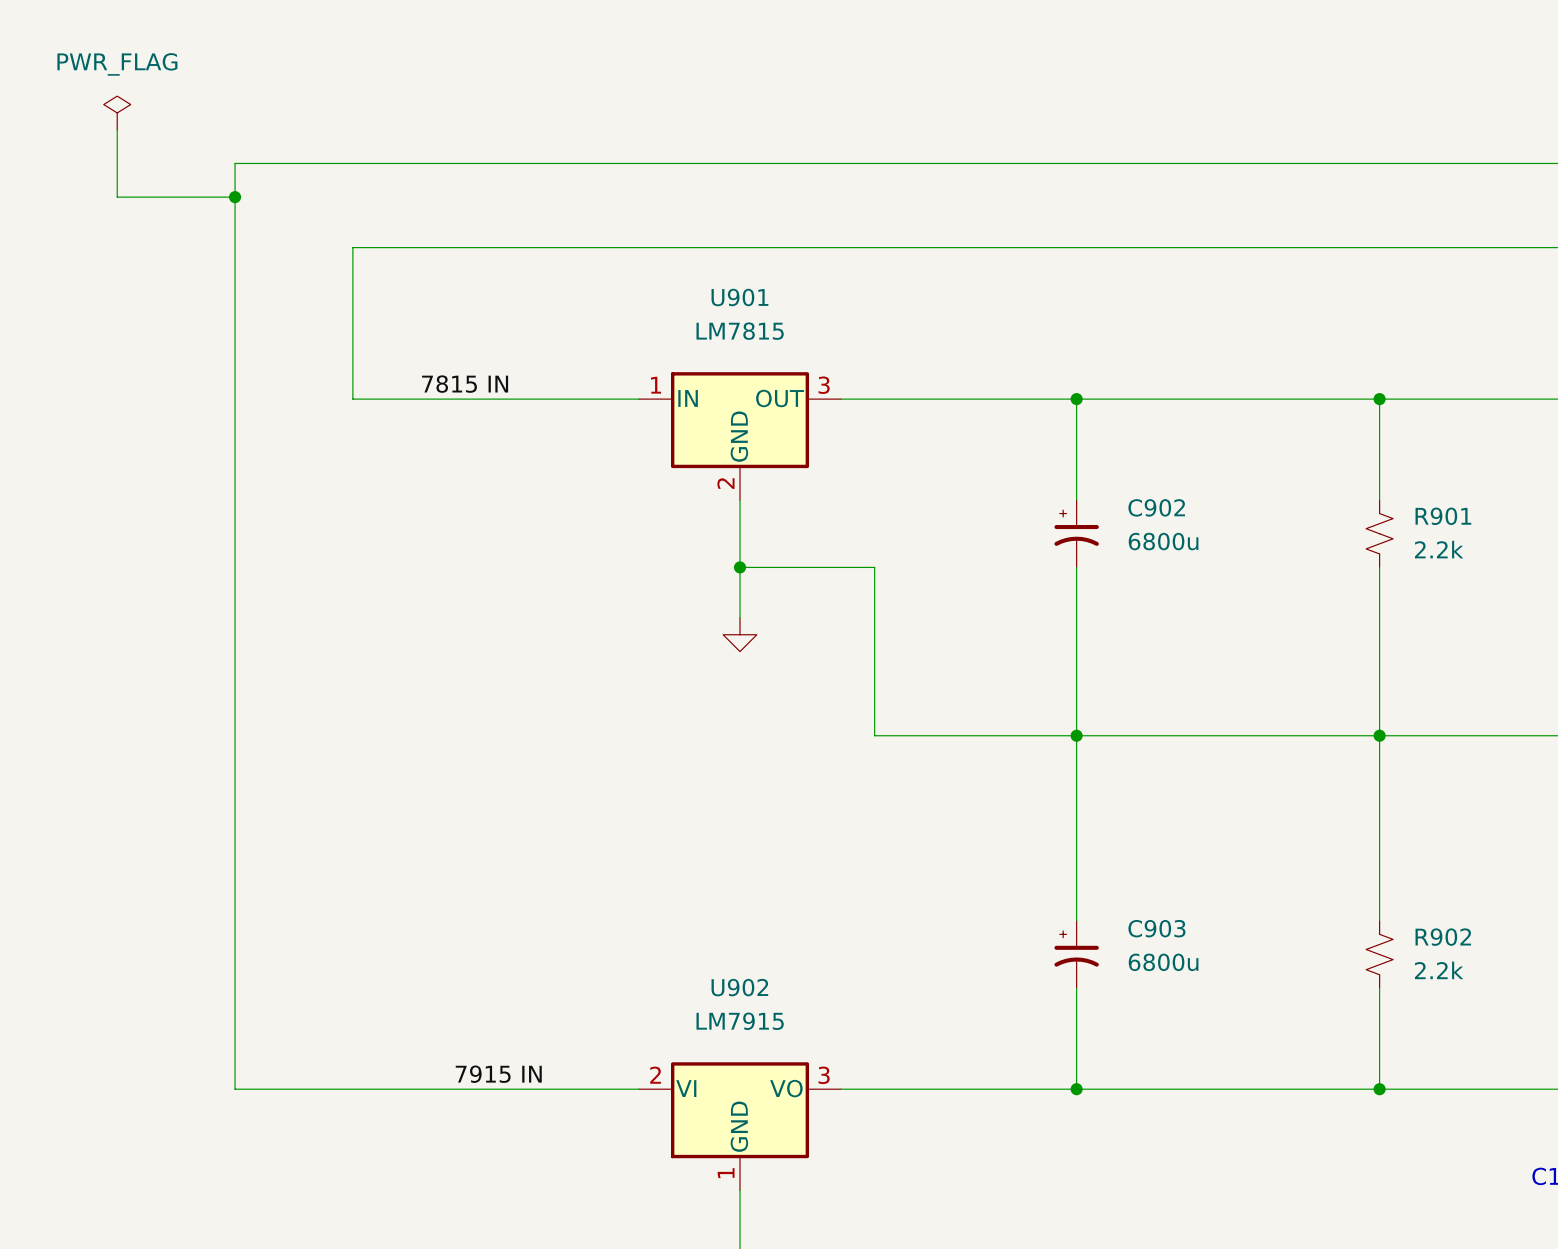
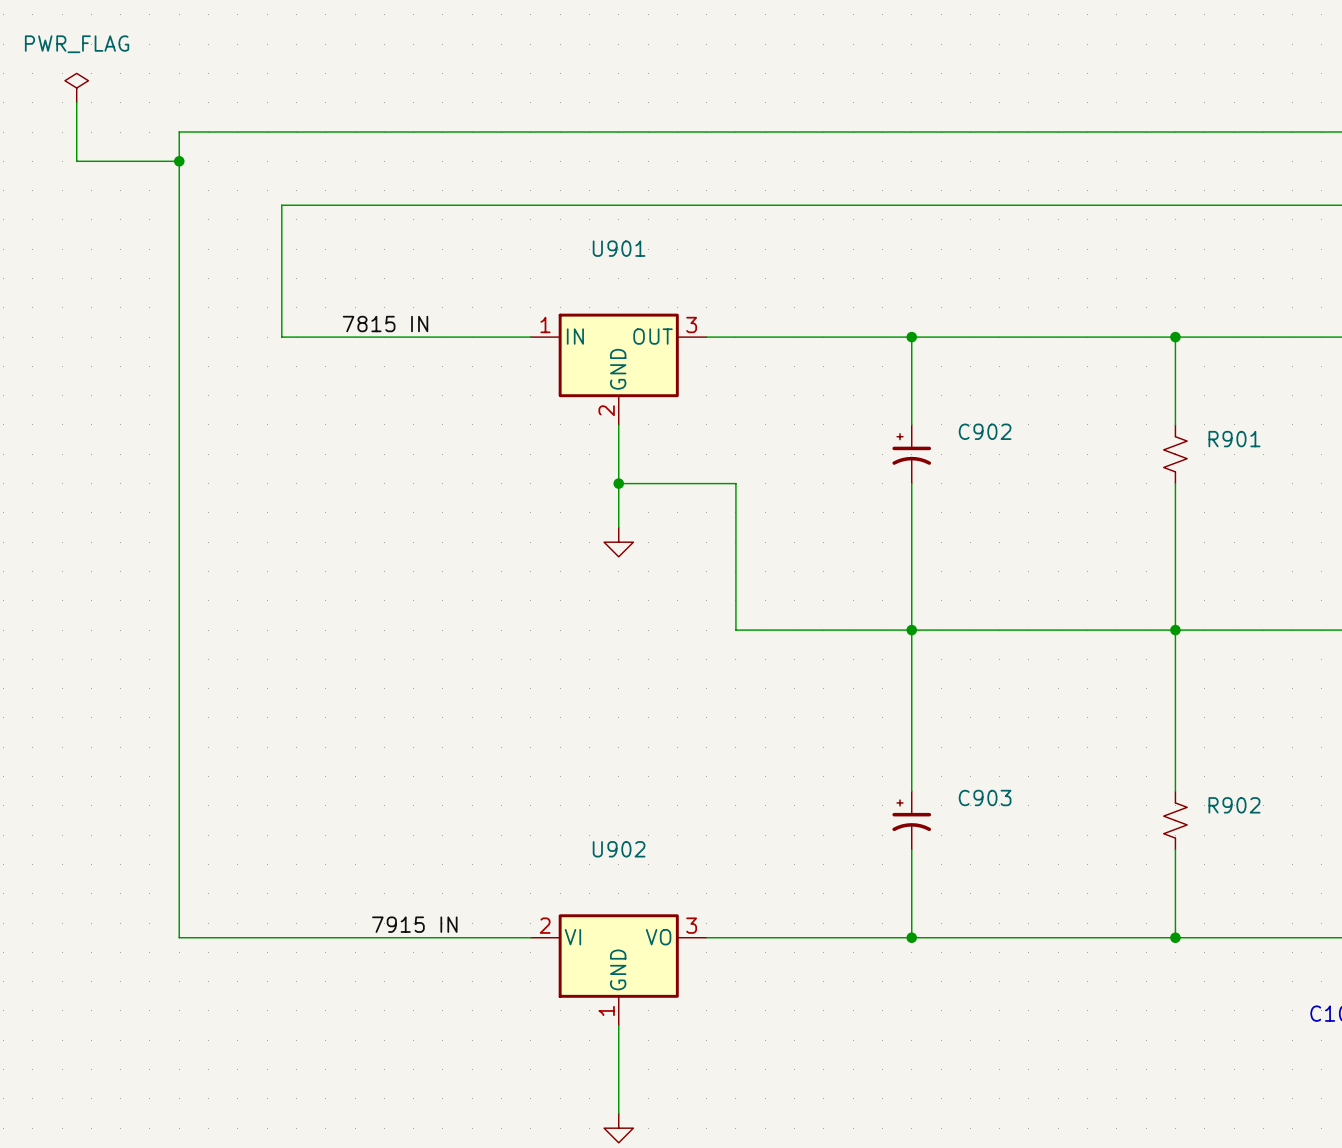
U901 value: LM7815 (740, 331) -> none
C902 value: 6800u (1163, 541) -> none
R901 value: 2.2k (1439, 549) -> none
C903 value: 6800u (1163, 962) -> none
R902 value: 2.2k (1439, 970) -> none
U902 value: LM7915 (740, 1021) -> none

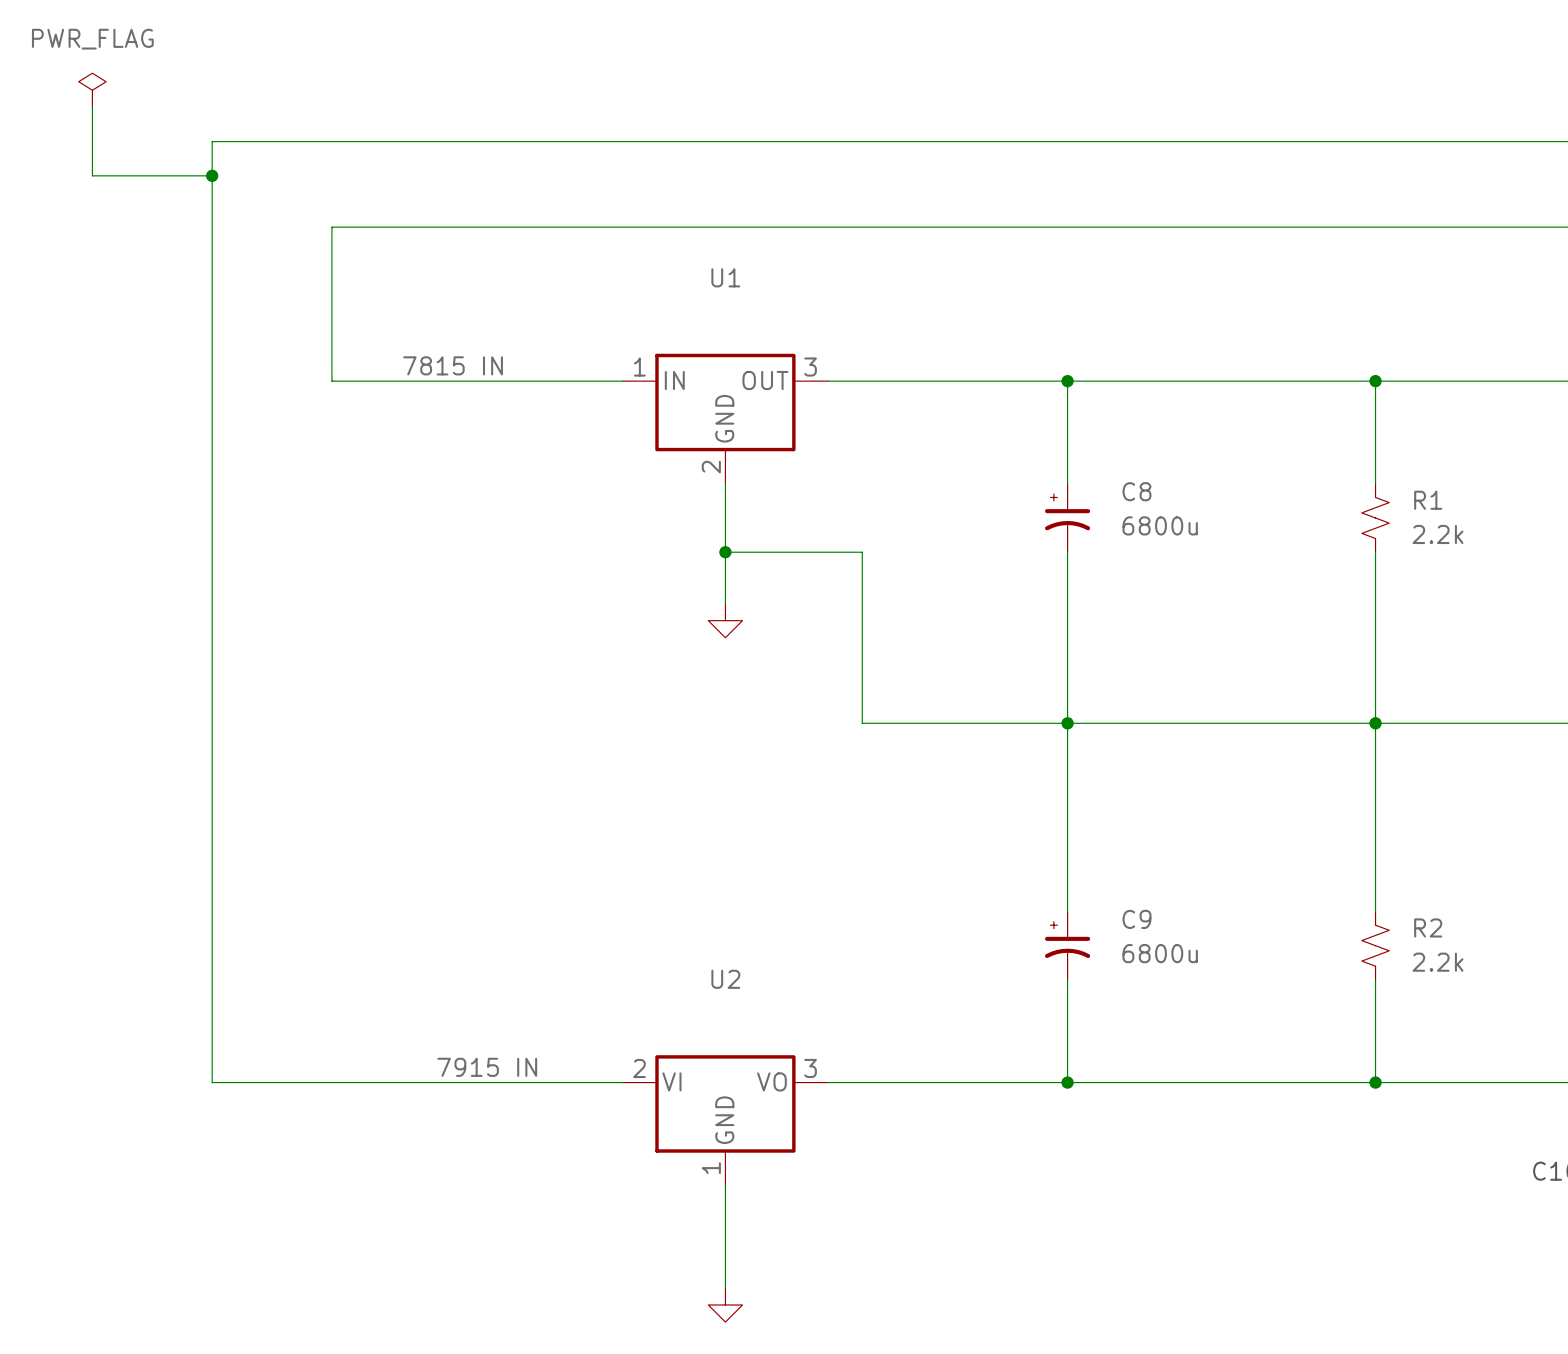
U901 name: U901 (619, 248) -> U1 (725, 277)
C902 name: C902 (985, 431) -> C8 (1136, 491)
R901 name: R901 (1234, 439) -> R1 (1428, 500)
C902 value: none -> 6800u (1160, 525)
R901 value: none -> 2.2k (1437, 534)
C903 name: C903 (985, 798) -> C9 (1136, 919)
R902 name: R902 (1234, 805) -> R2 (1428, 927)
C903 value: none -> 6800u (1160, 953)
R902 value: none -> 2.2k (1437, 962)
U902 name: U902 (619, 849) -> U2 (725, 979)

